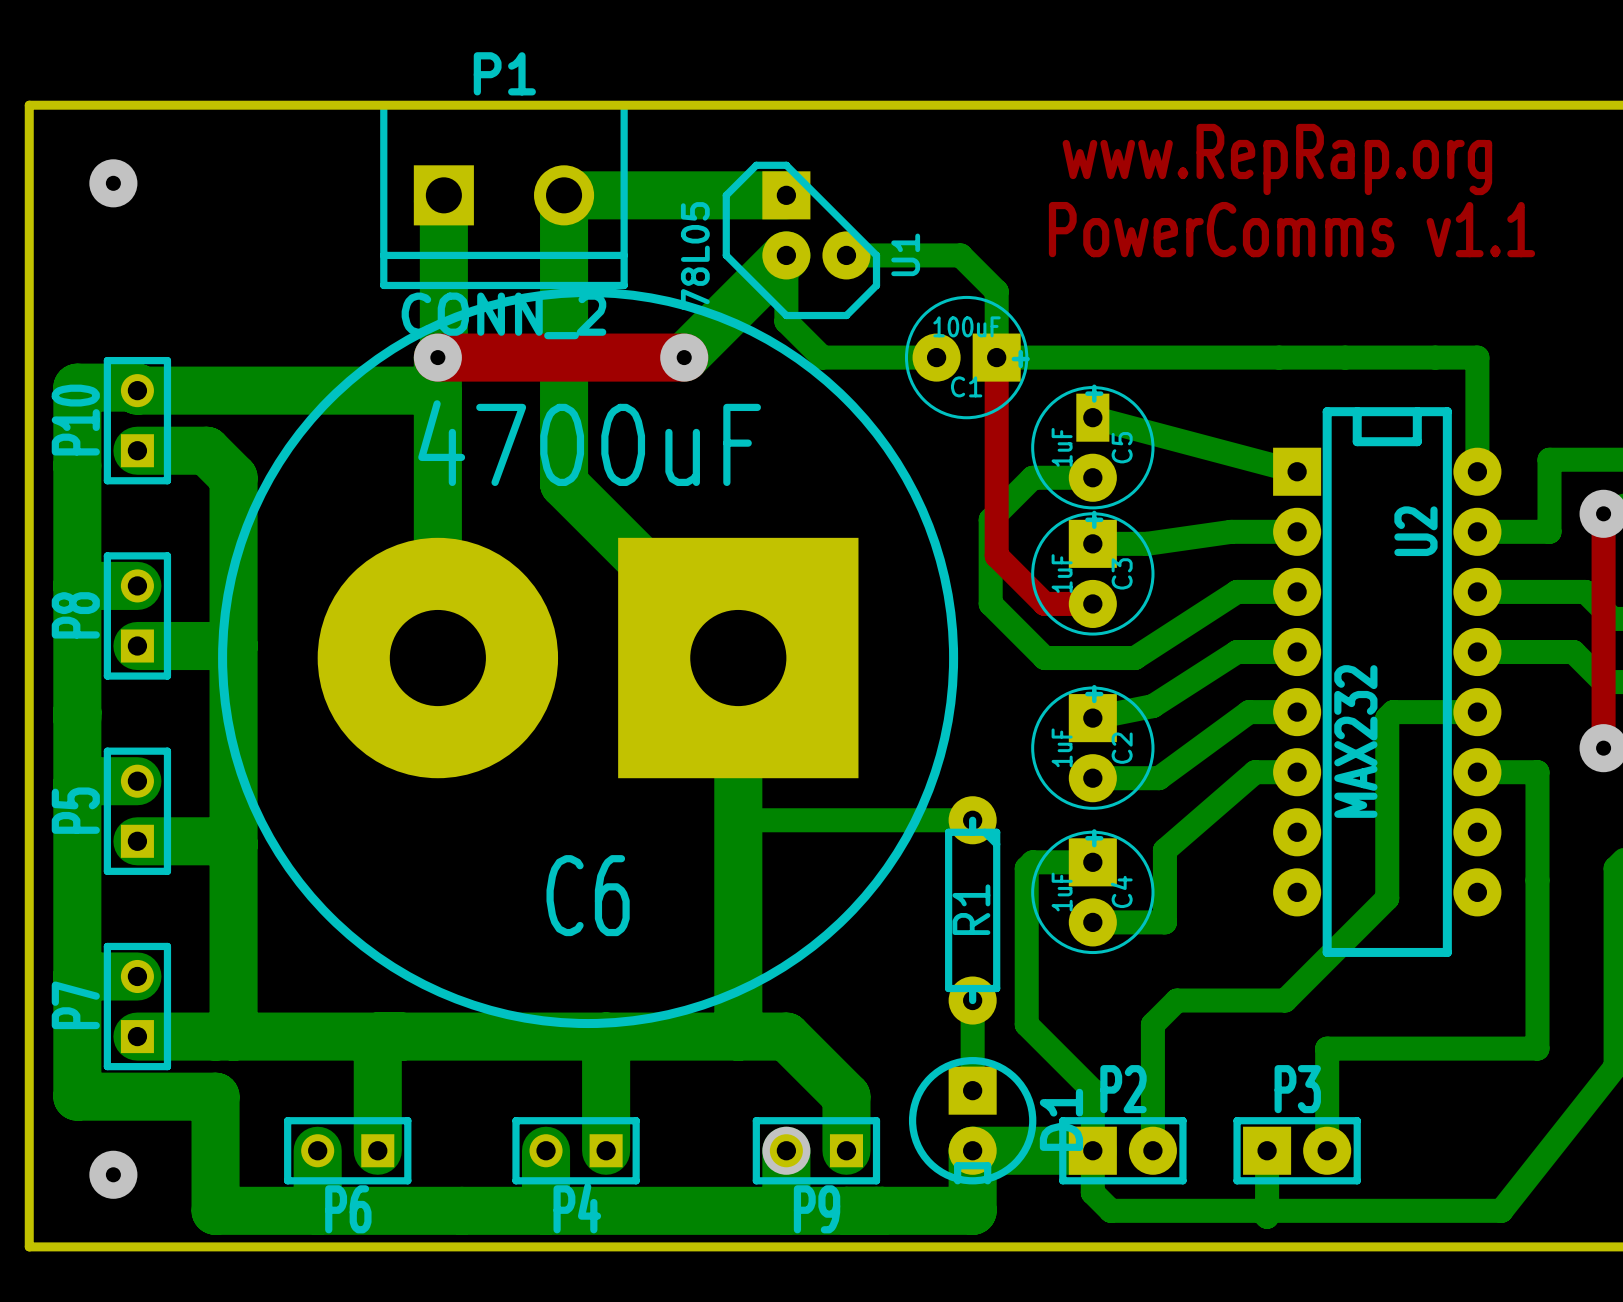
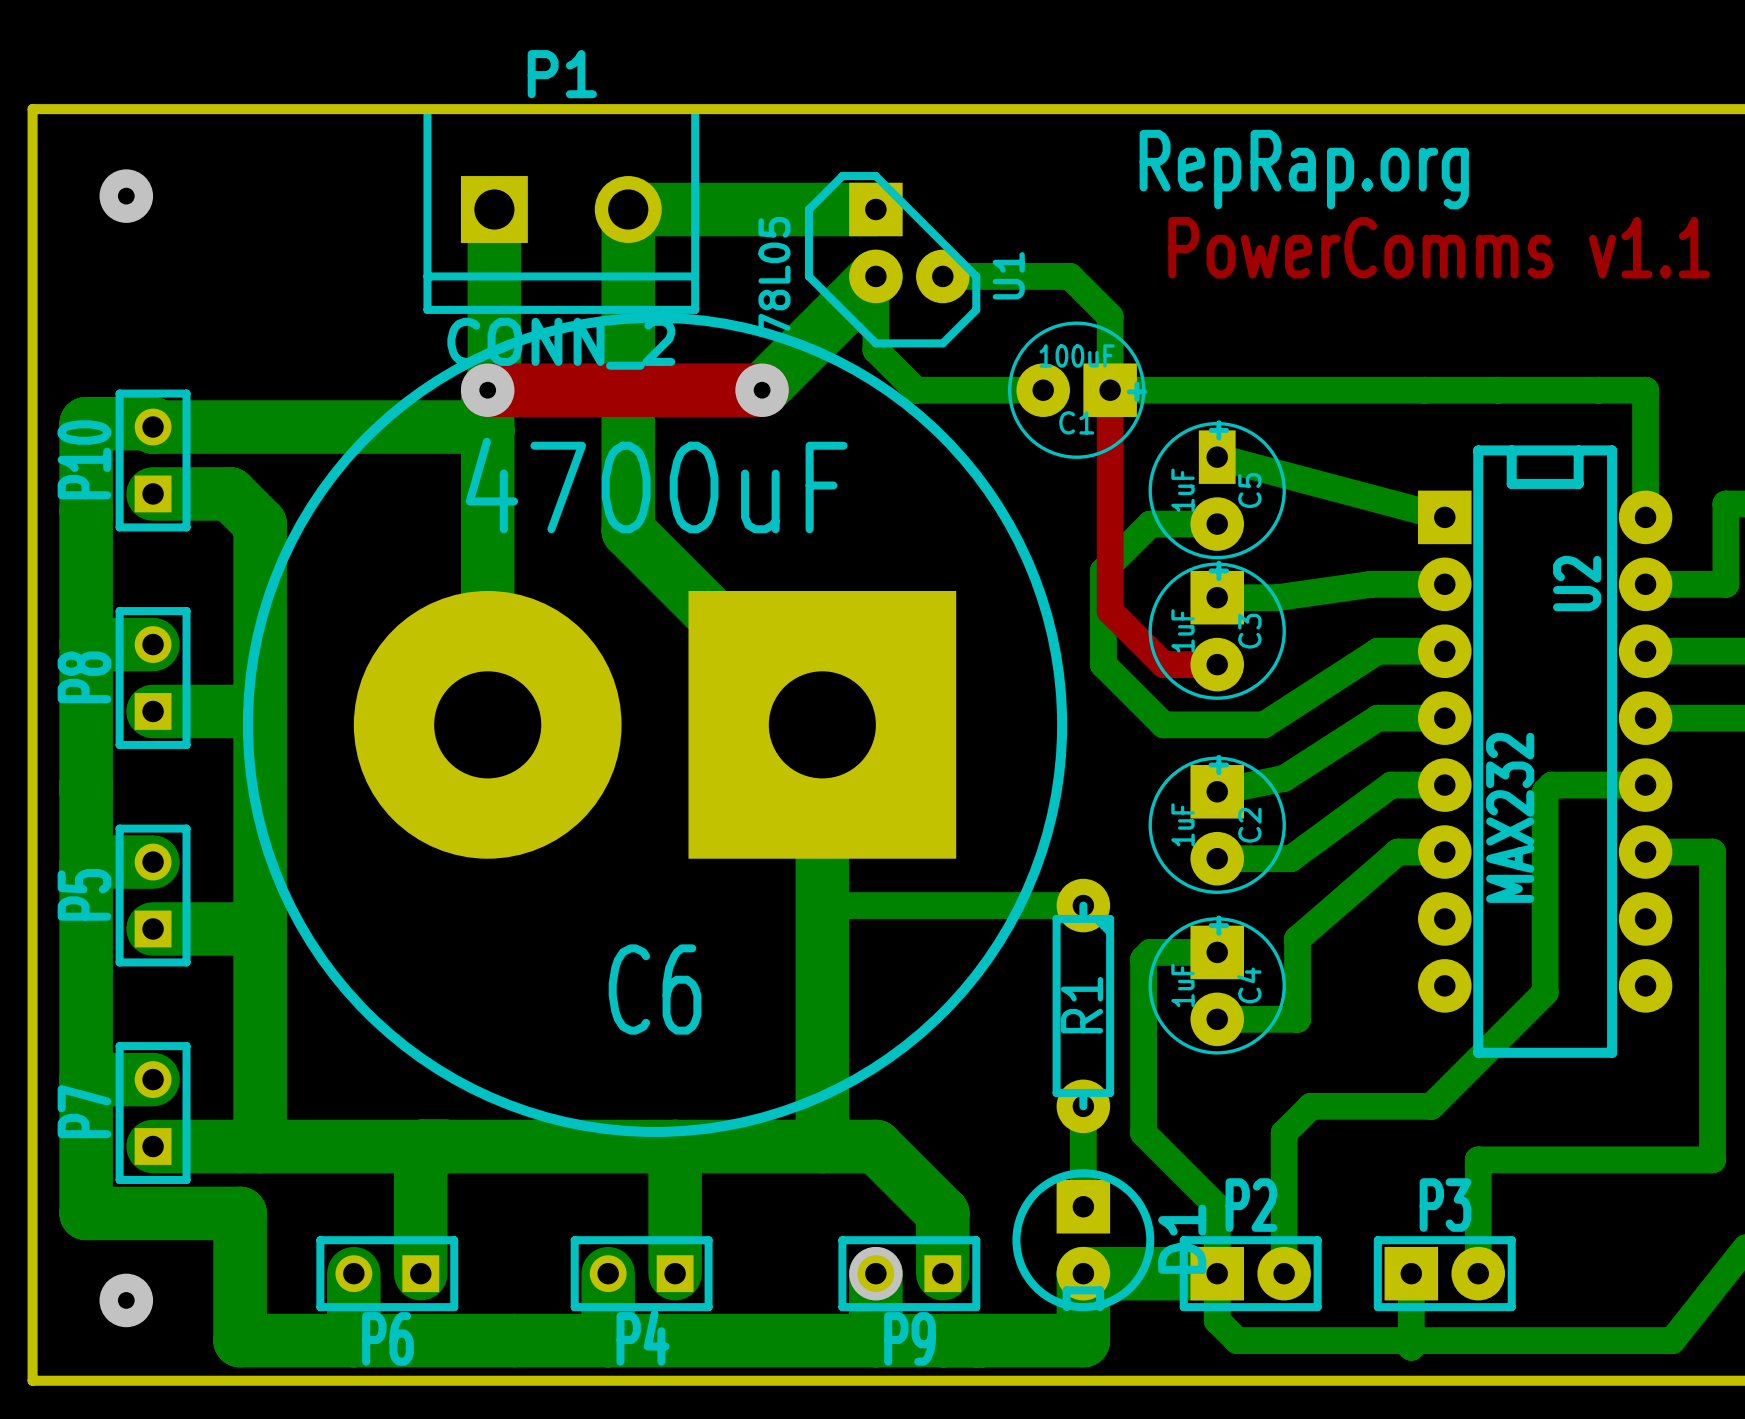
text: www.RepRap.org (1277, 159) -> RepRap.org (1304, 169)

